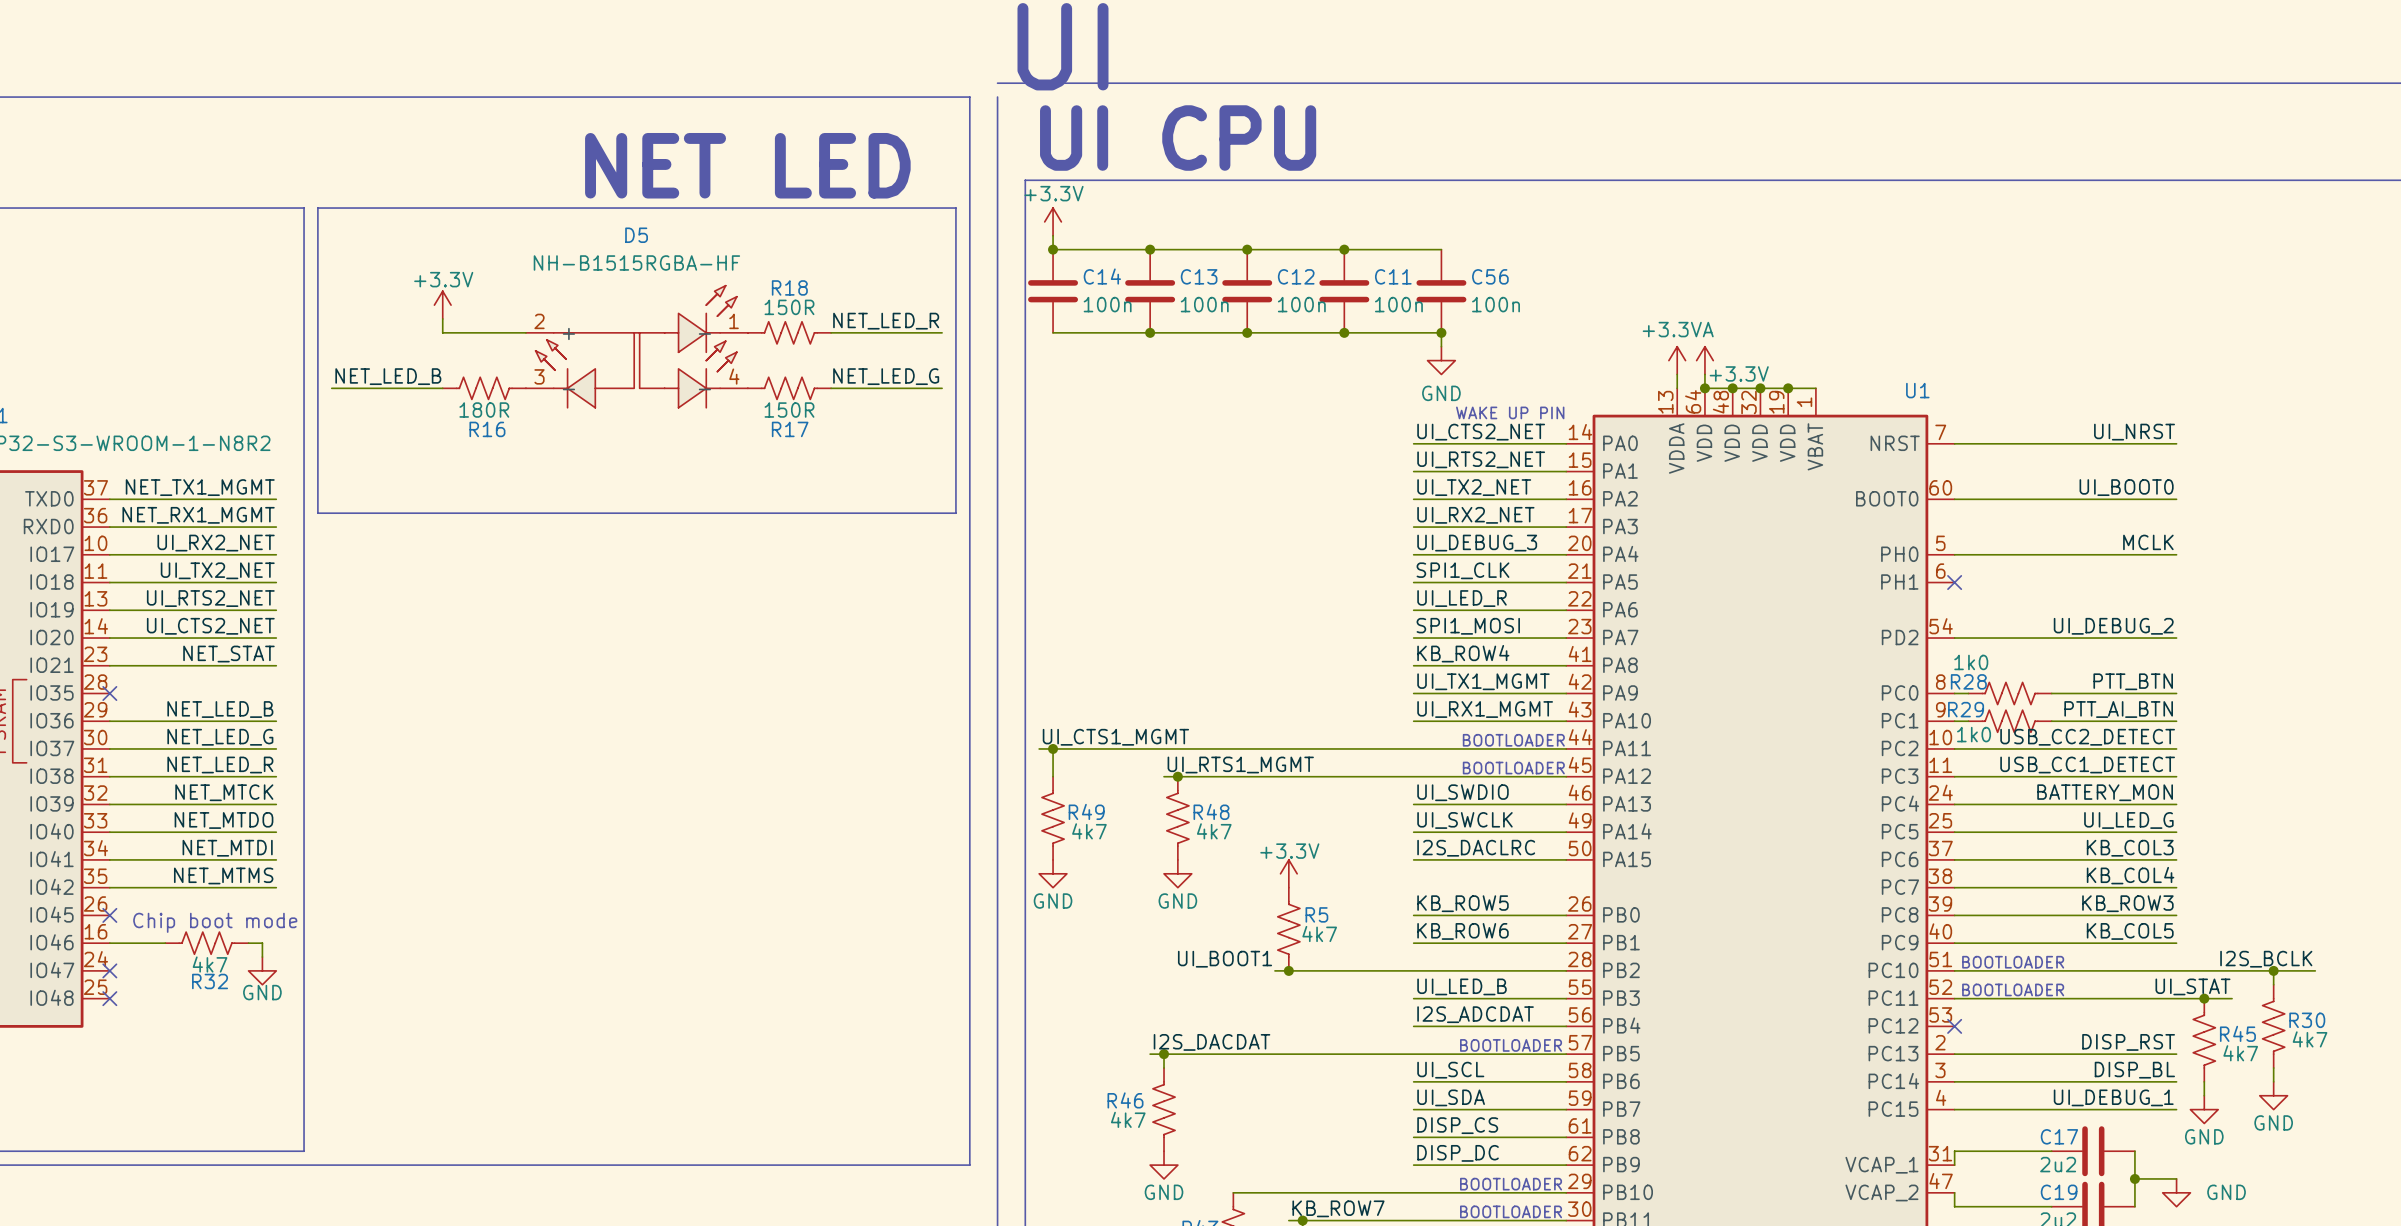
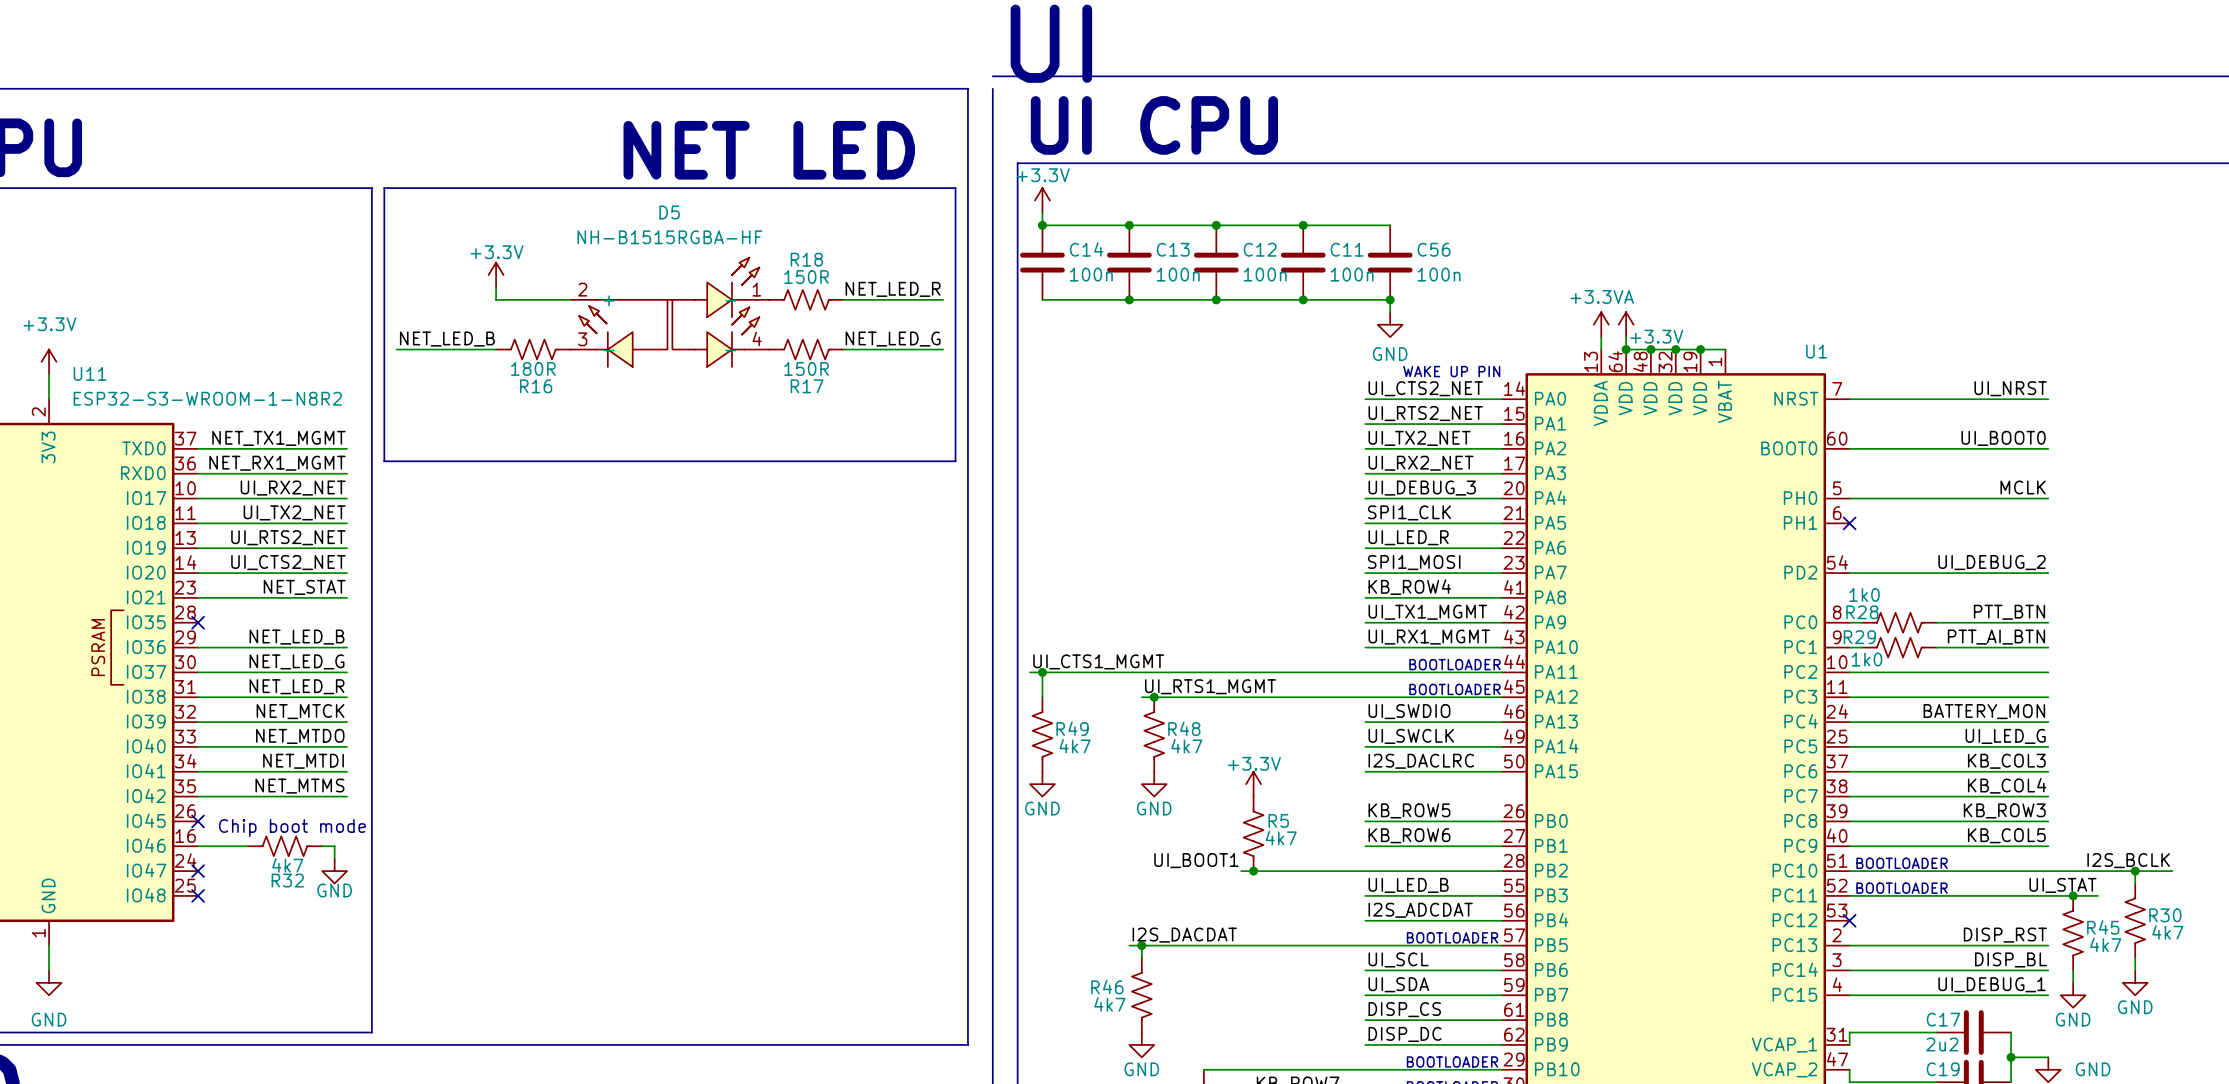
label: USB_CC2_DETECT (2087, 737) -> none
label: USB_CC1_DETECT (2087, 765) -> none

